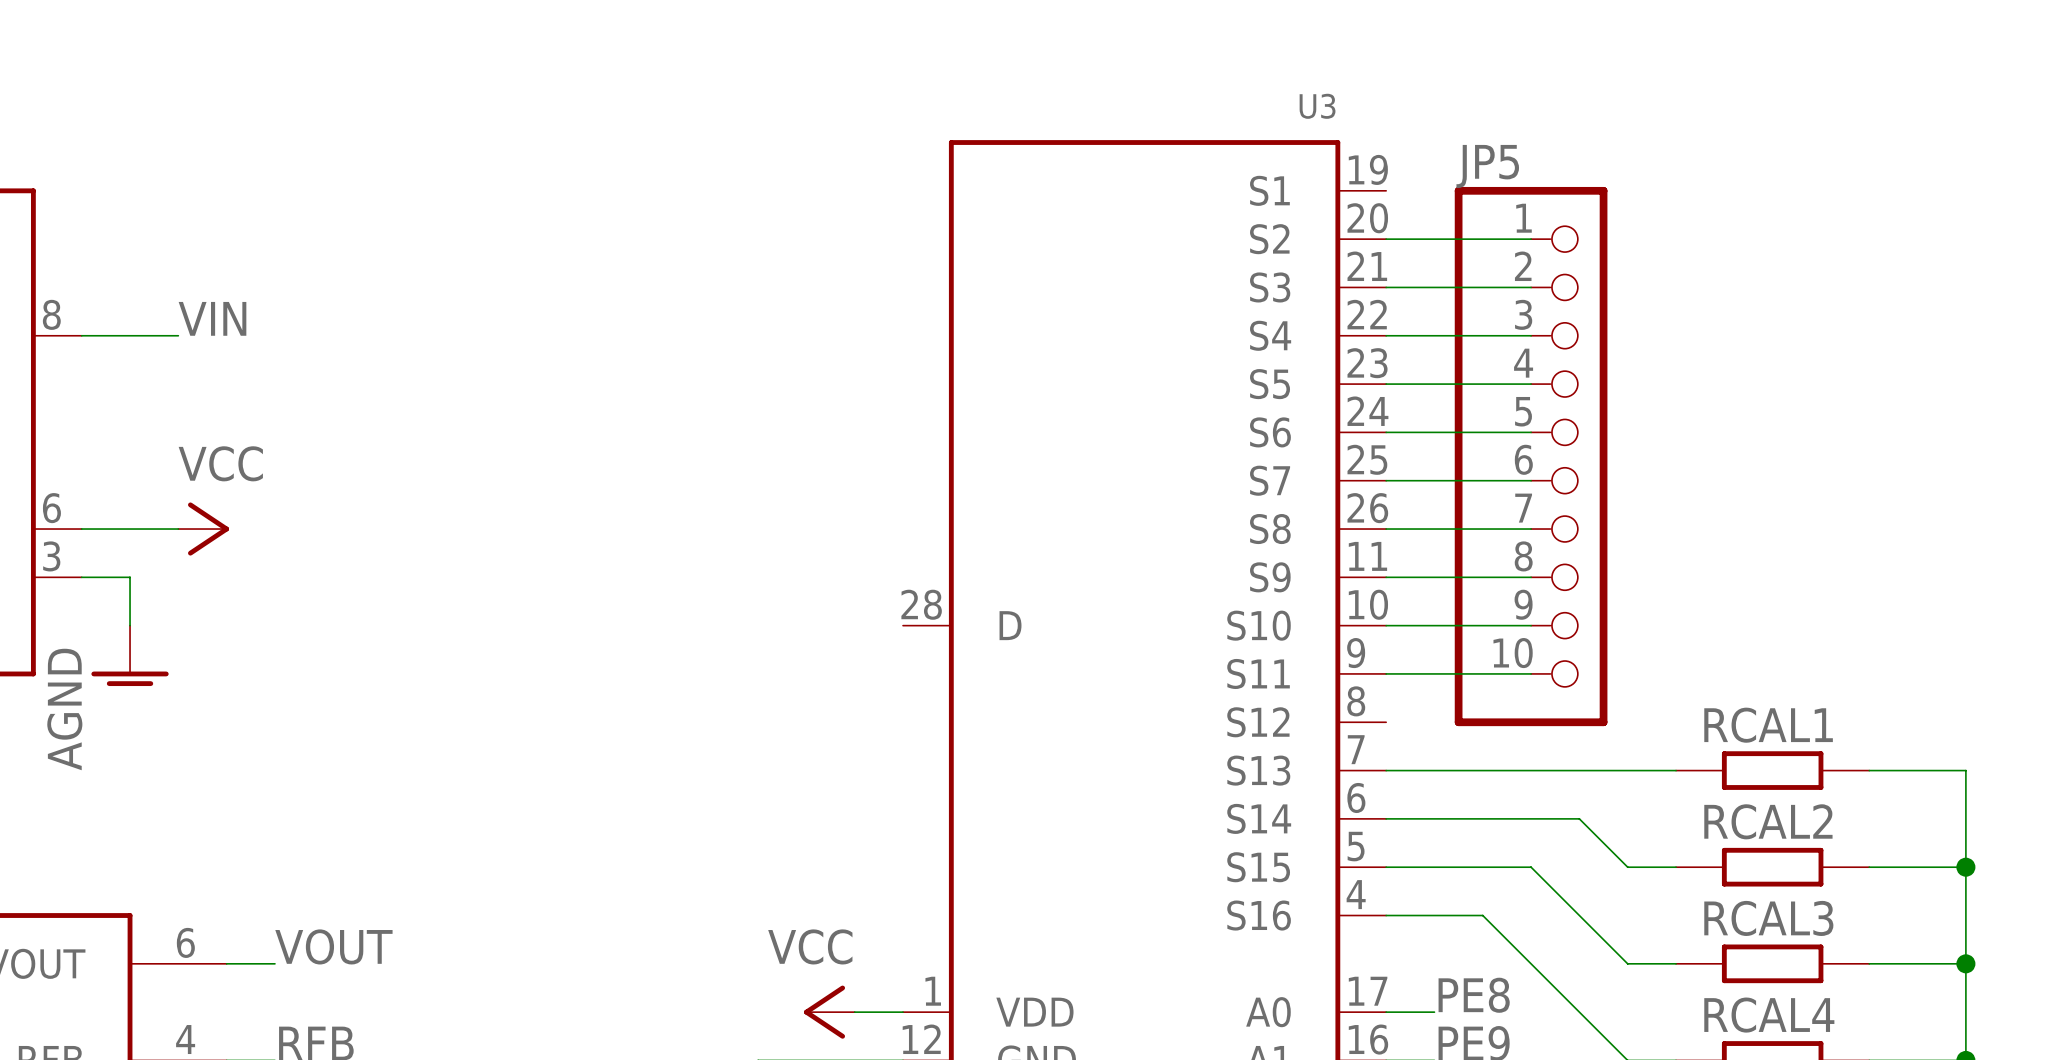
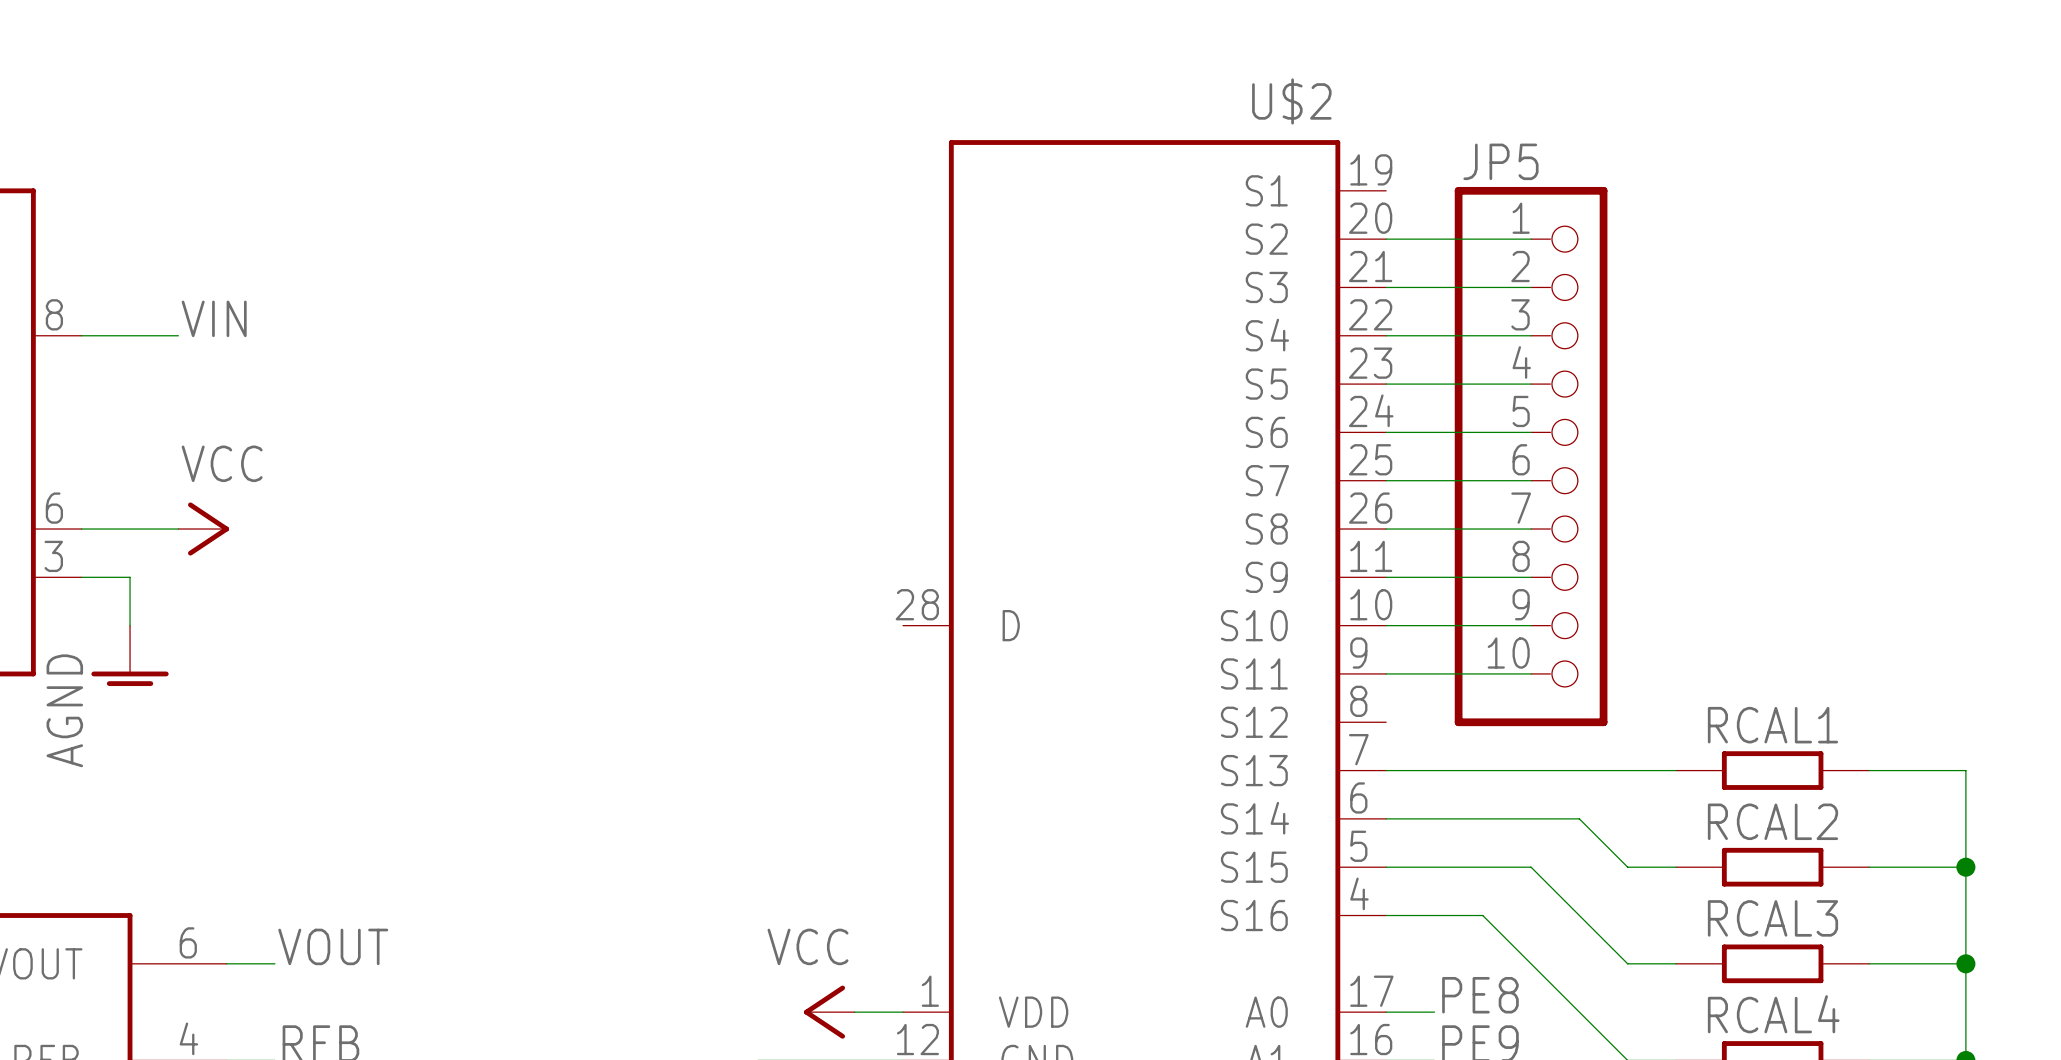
U3 name: U3 (1317, 106) -> U$2 (1291, 101)

